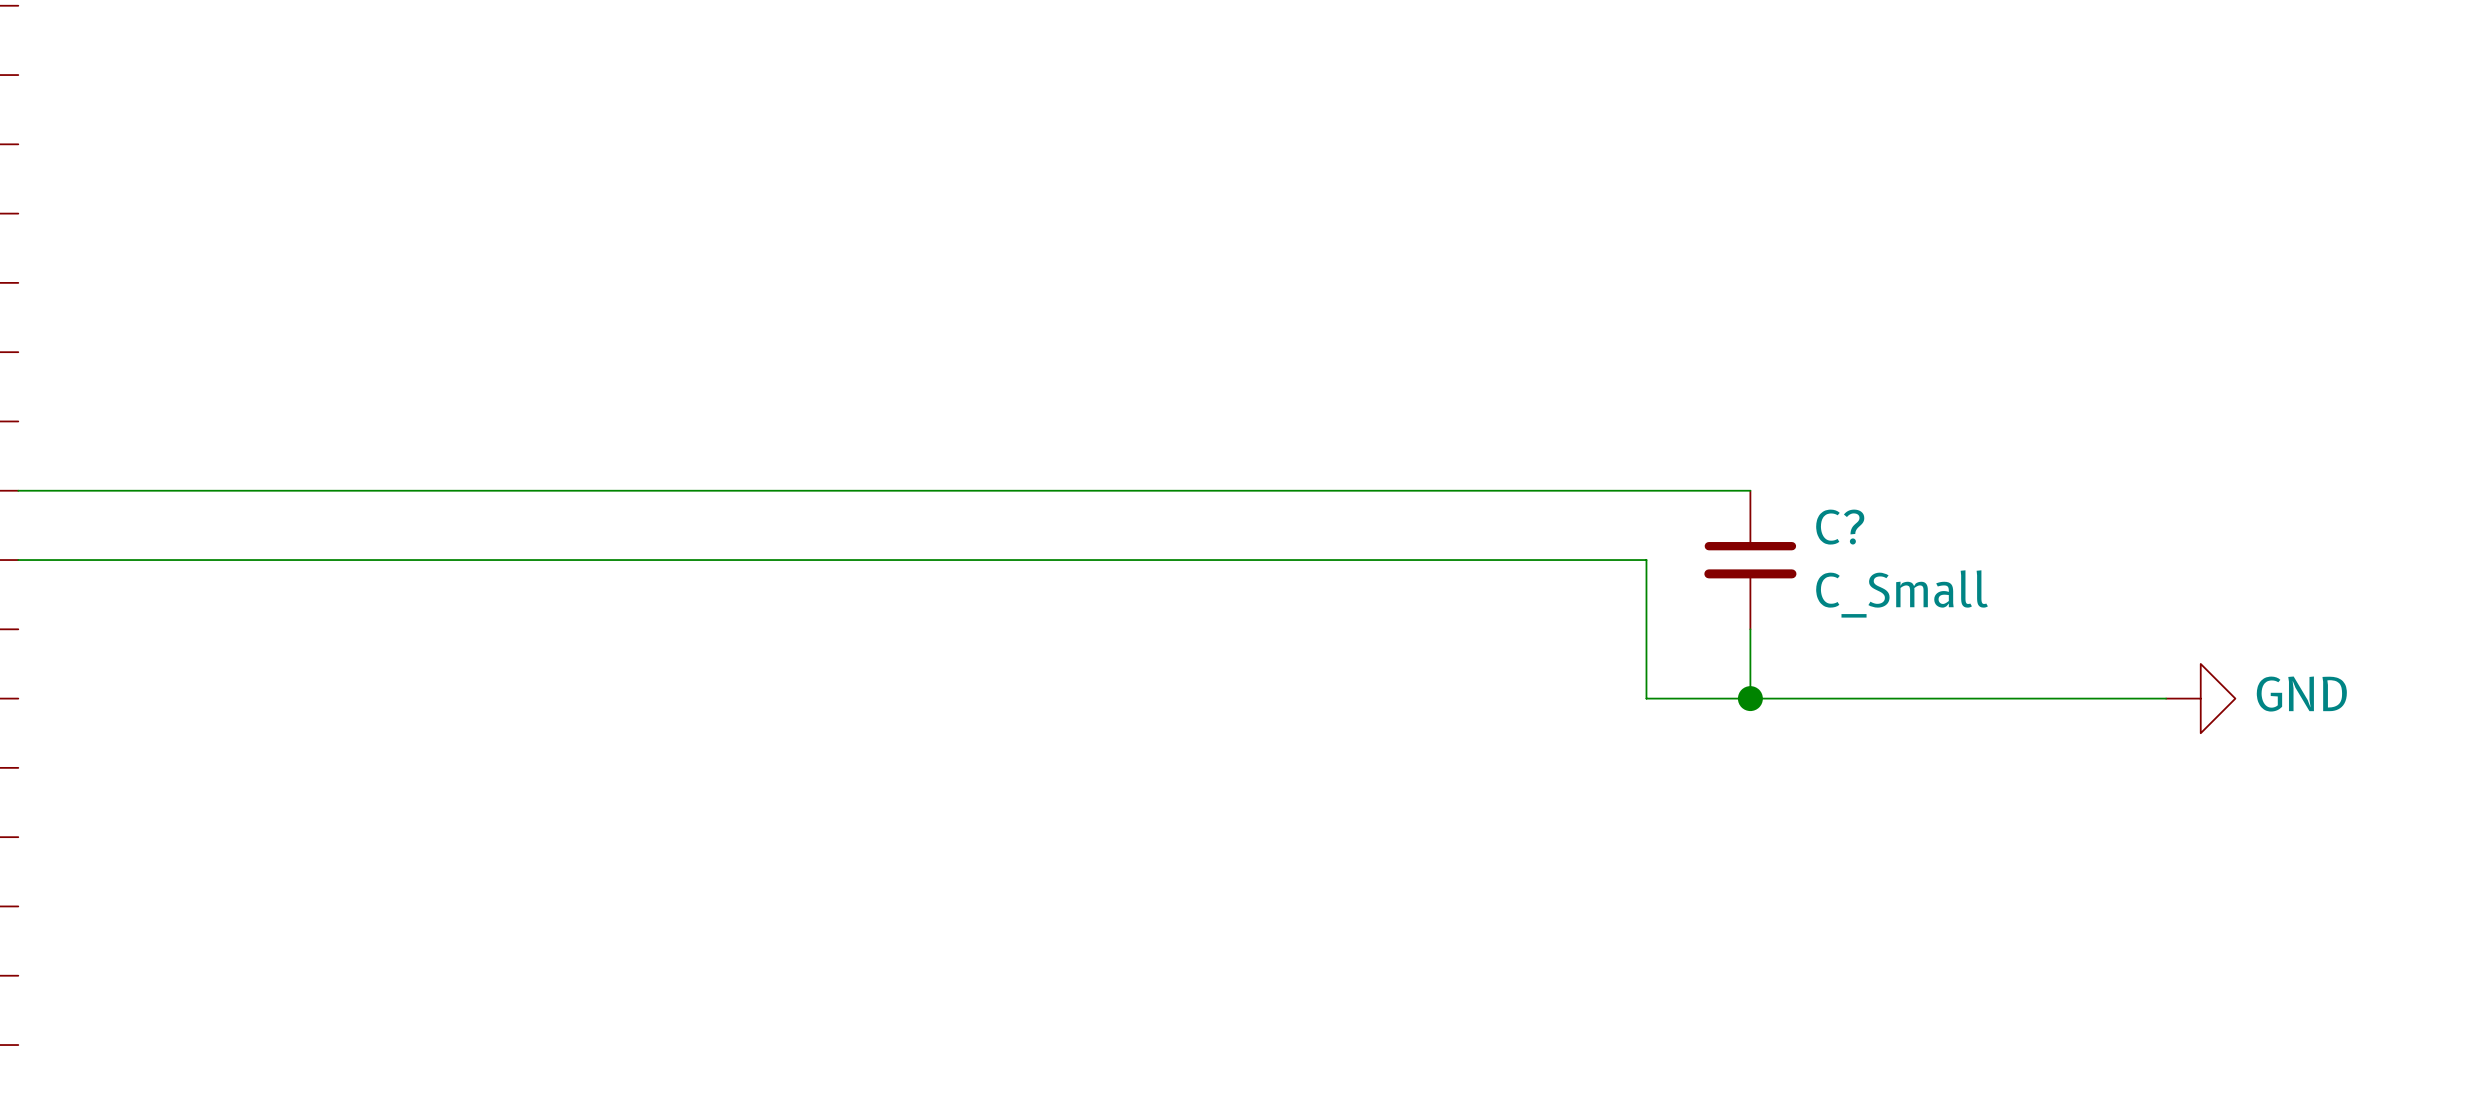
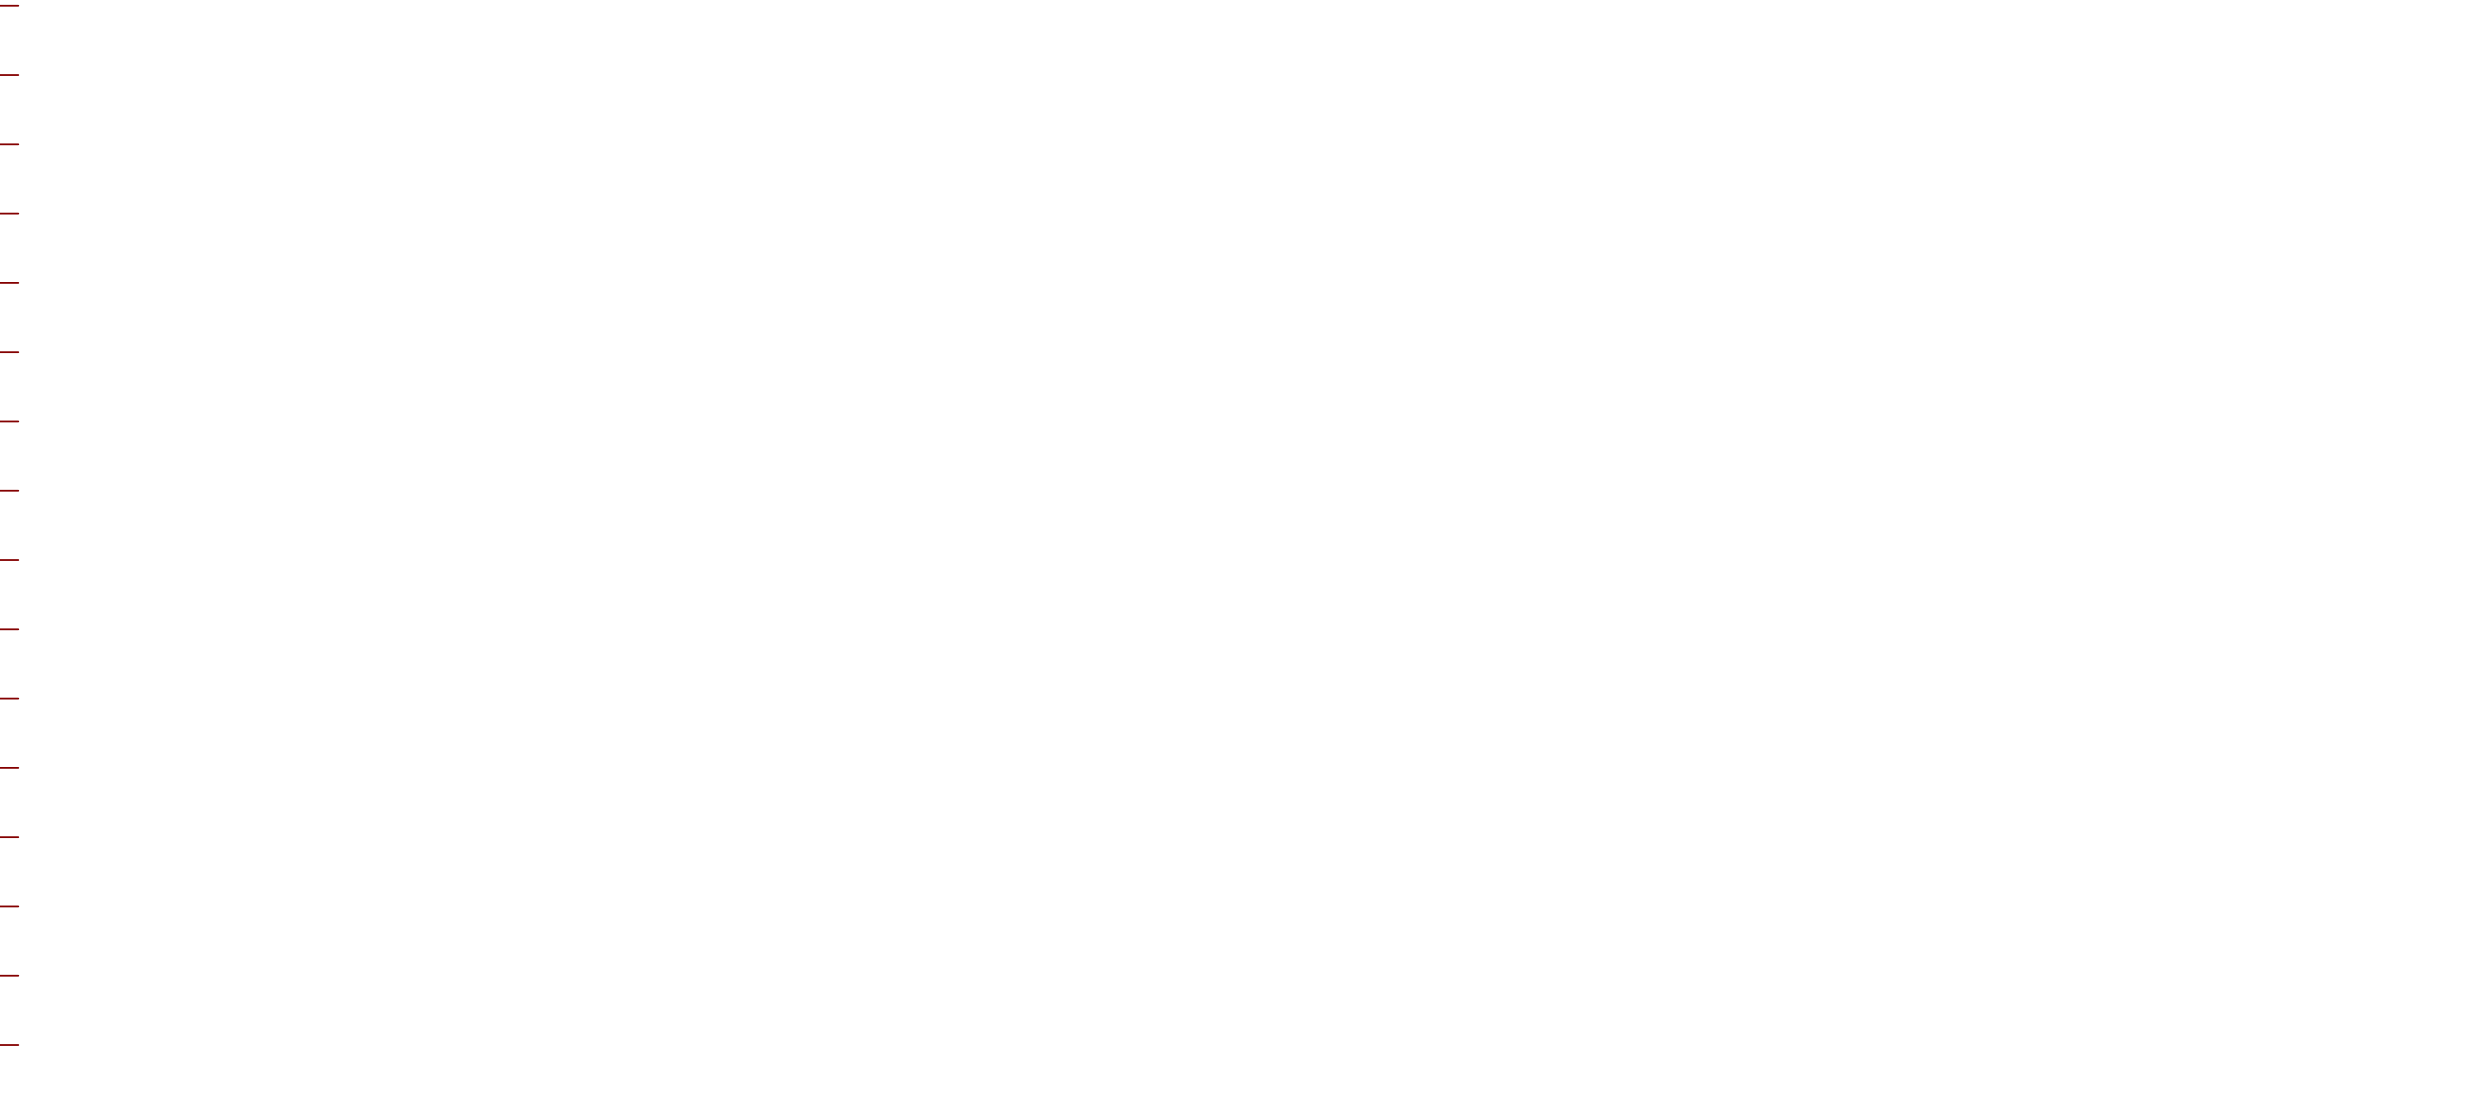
wire: (18, 490) (1750, 490) -> none
wire: (18, 560) (1646, 560) (1646, 698) (2166, 698) -> none
C?: C_Small (1750, 560) -> none
wire: (1750, 629) (1750, 698) -> none
junction: (1750, 698) -> none
power symbol: GND (2200, 698) -> none

